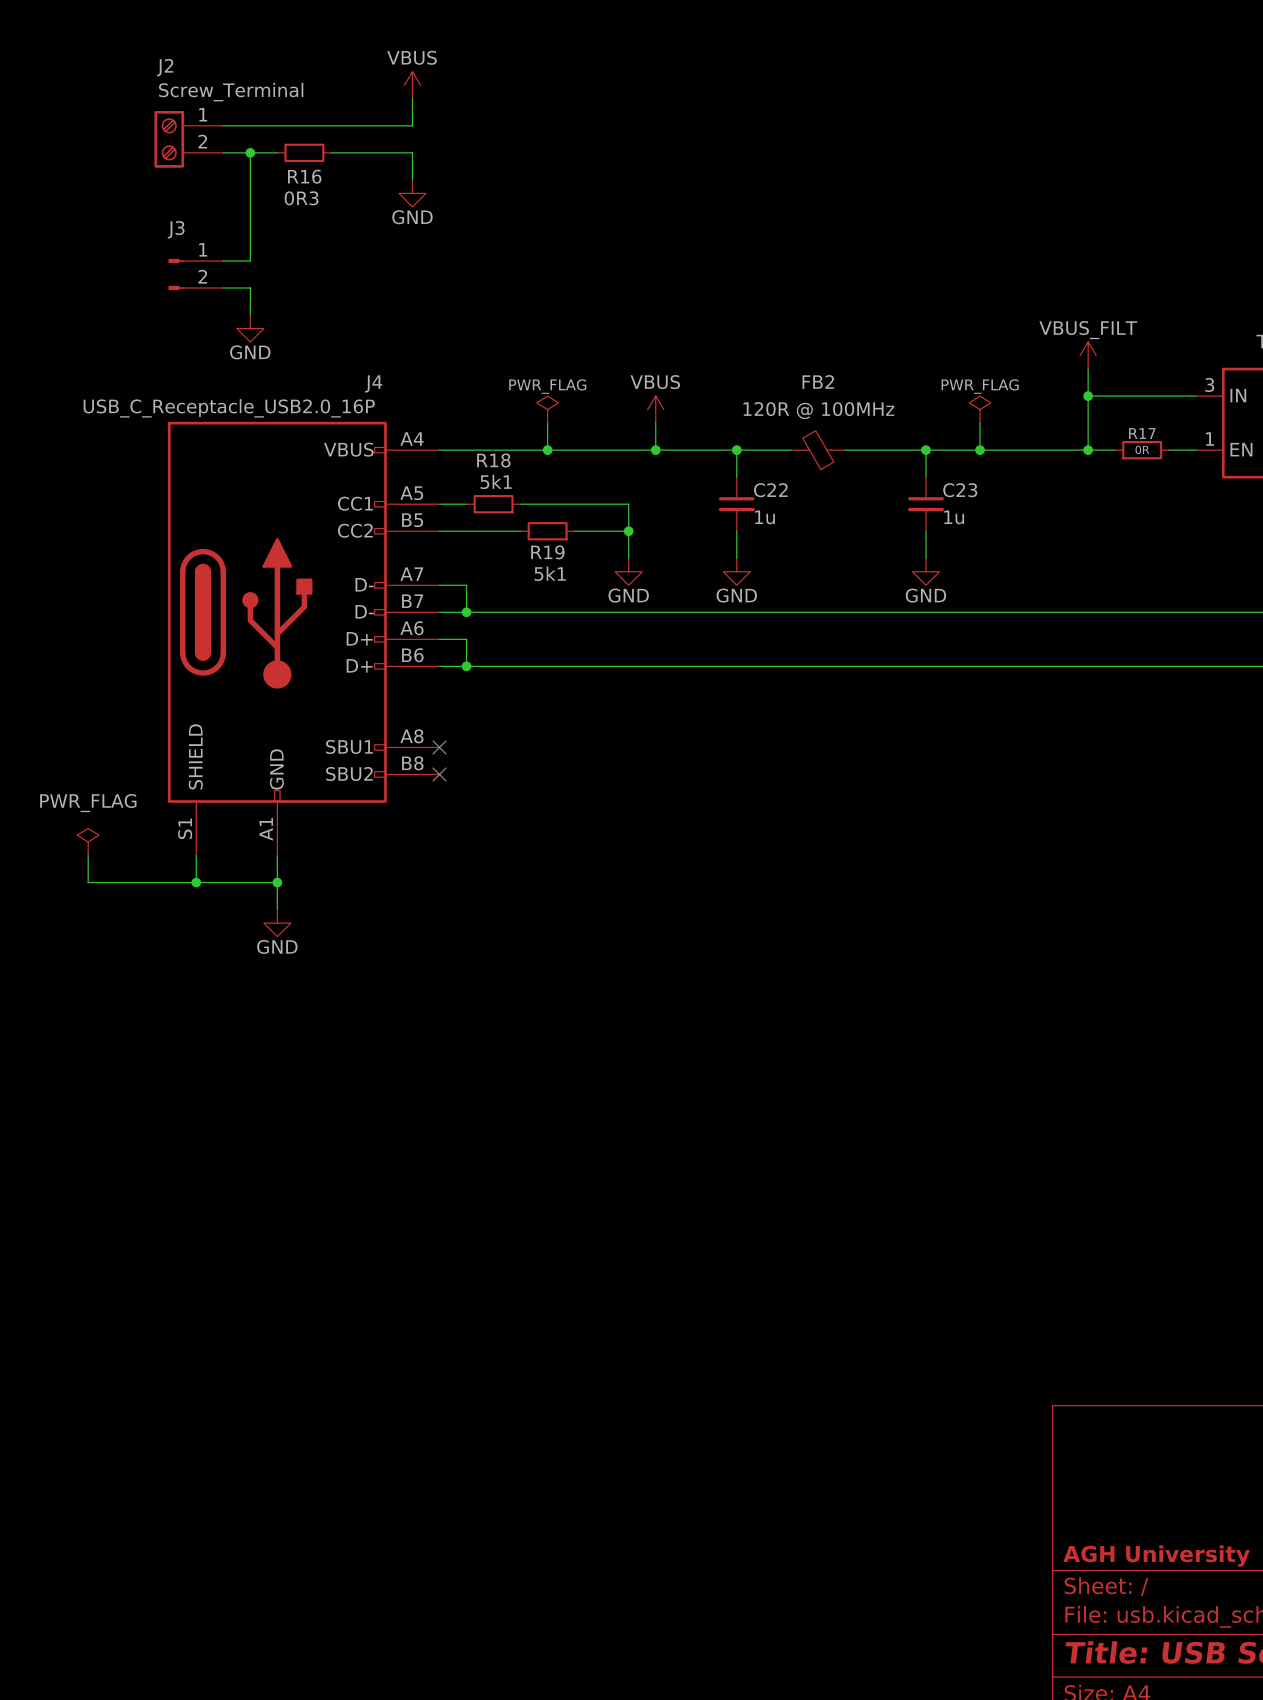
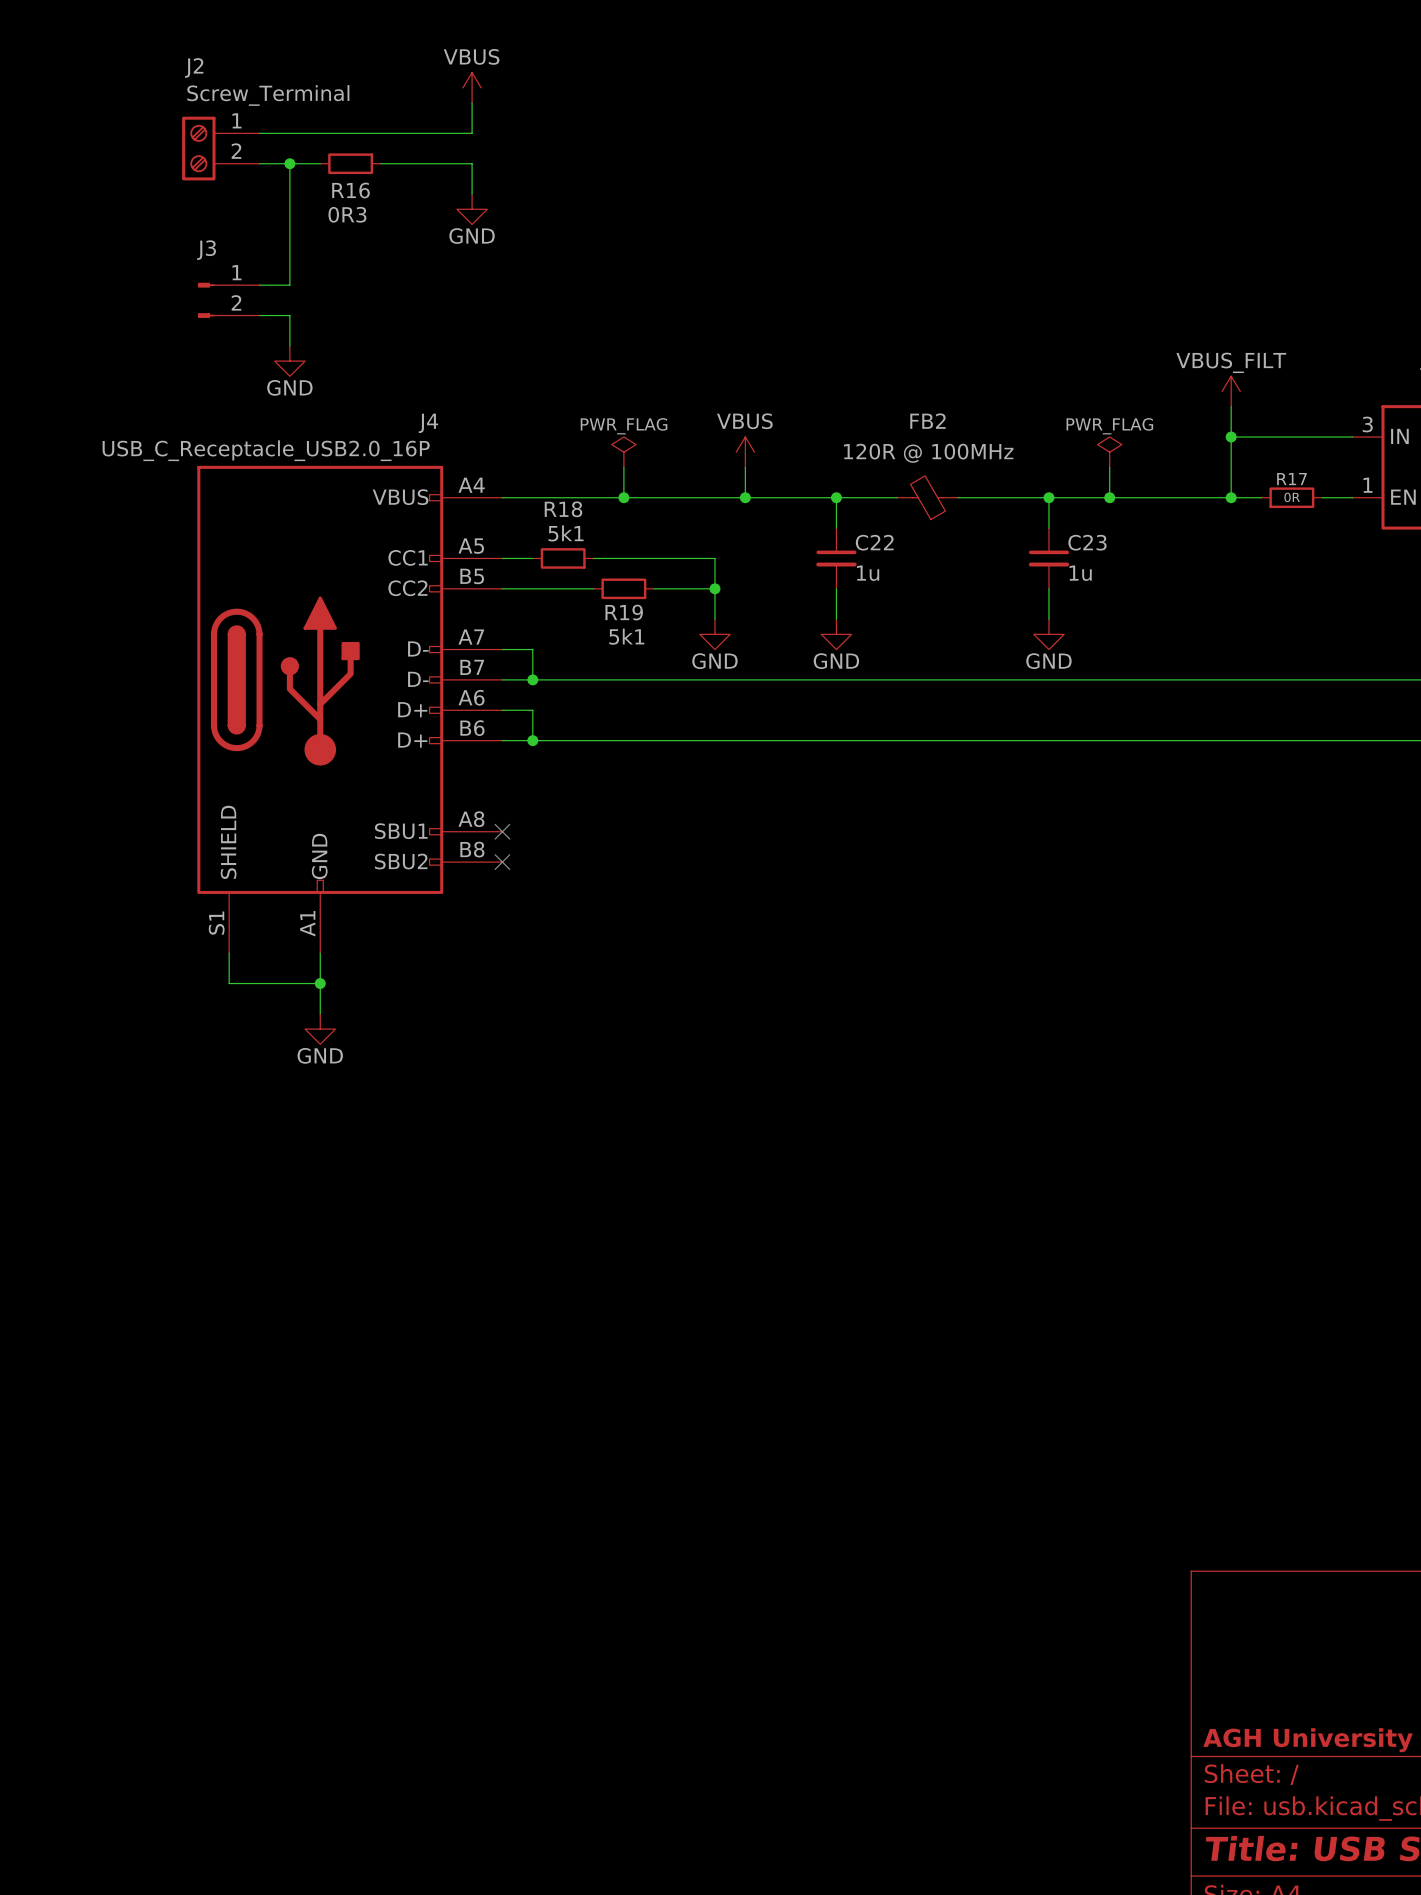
power symbol: PWR_FLAG (88, 842) -> none
wire: (88, 855) (88, 882) (196, 882) -> none
junction: (196, 882) -> none

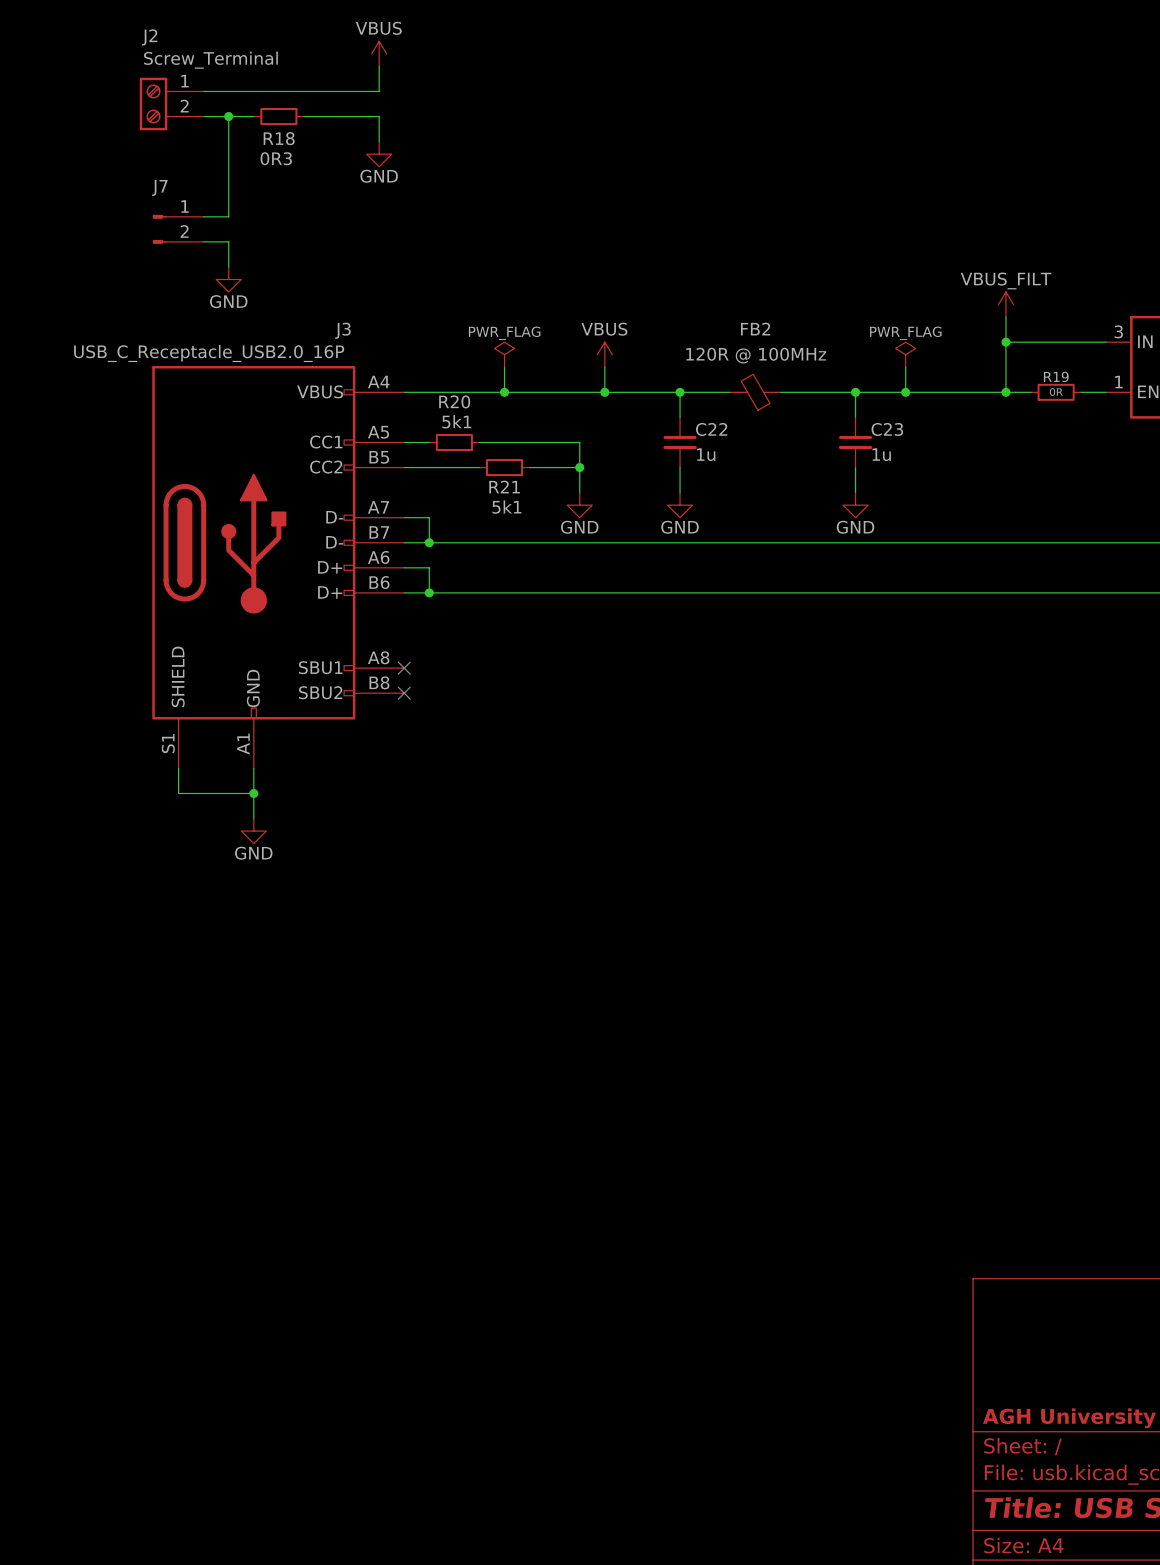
R16 name: R16 (350, 190) -> R18 (279, 138)
J3 name: J3 (206, 250) -> J7 (159, 187)
J4 name: J4 (428, 423) -> J3 (342, 330)
R17 name: R17 (1292, 479) -> R19 (1056, 376)
R18 name: R18 (563, 509) -> R20 (454, 401)
R19 name: R19 (624, 612) -> R21 (504, 487)

